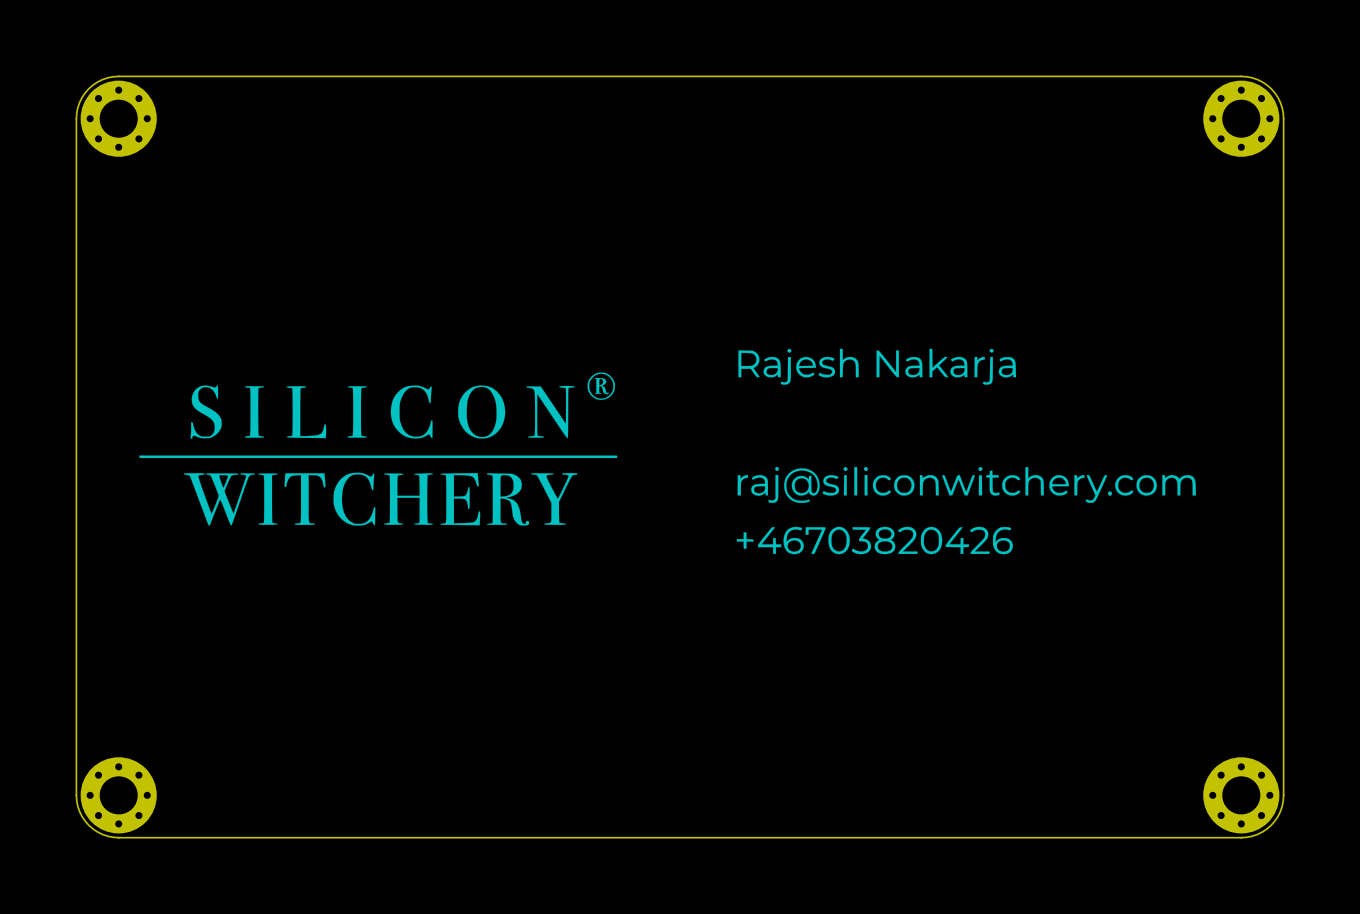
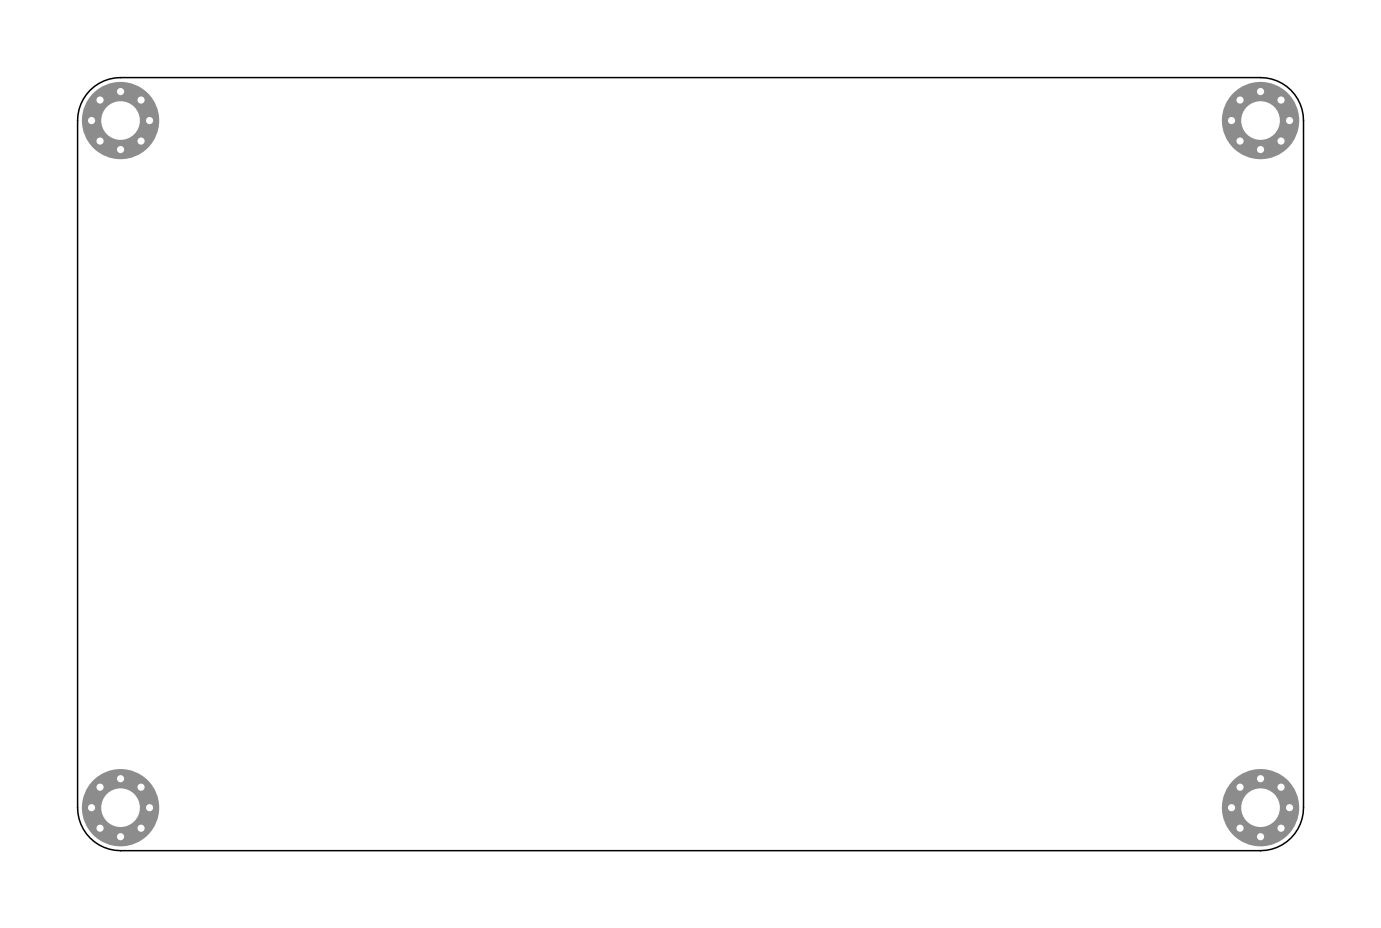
drawing: [139, 348, 1196, 555] -> none

